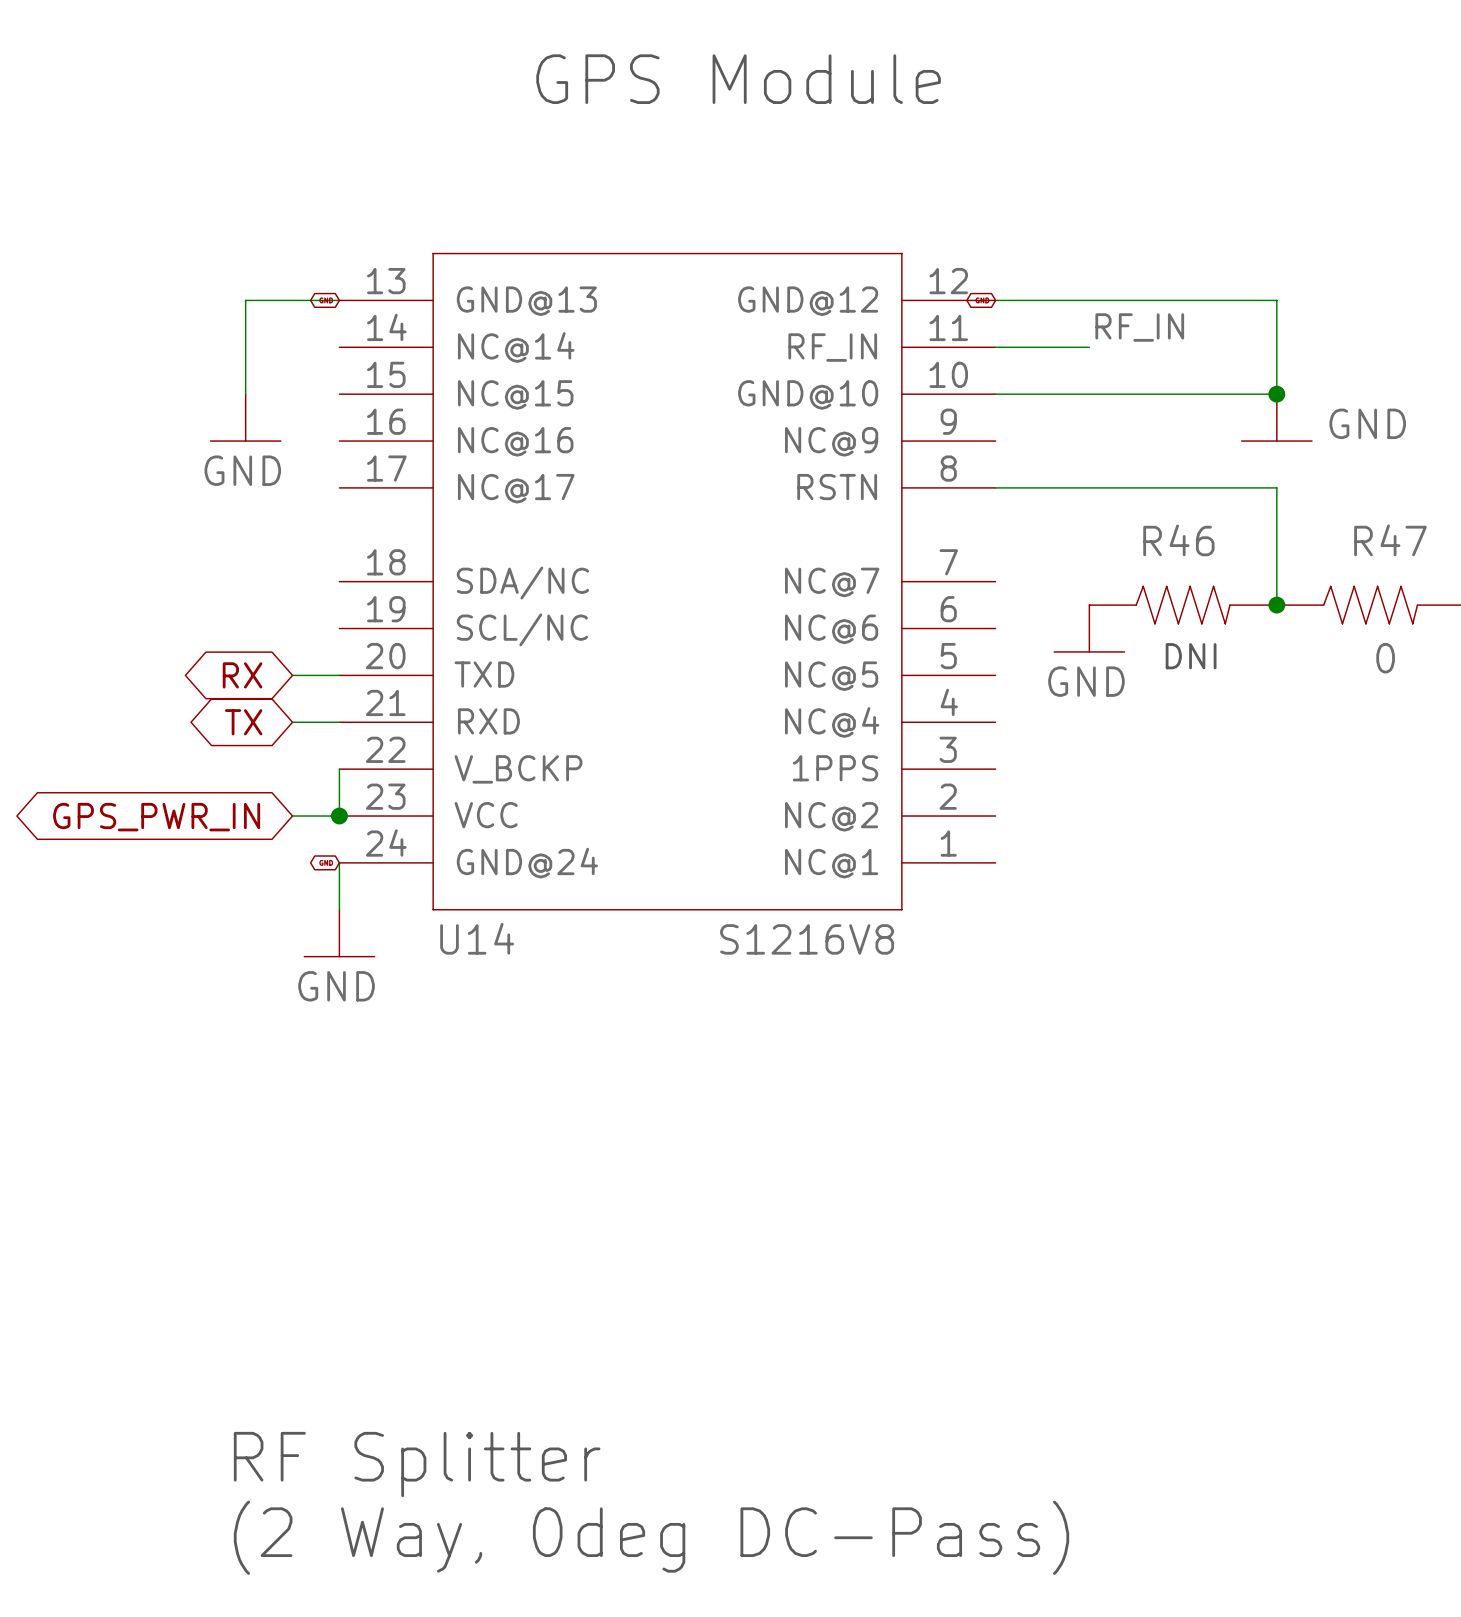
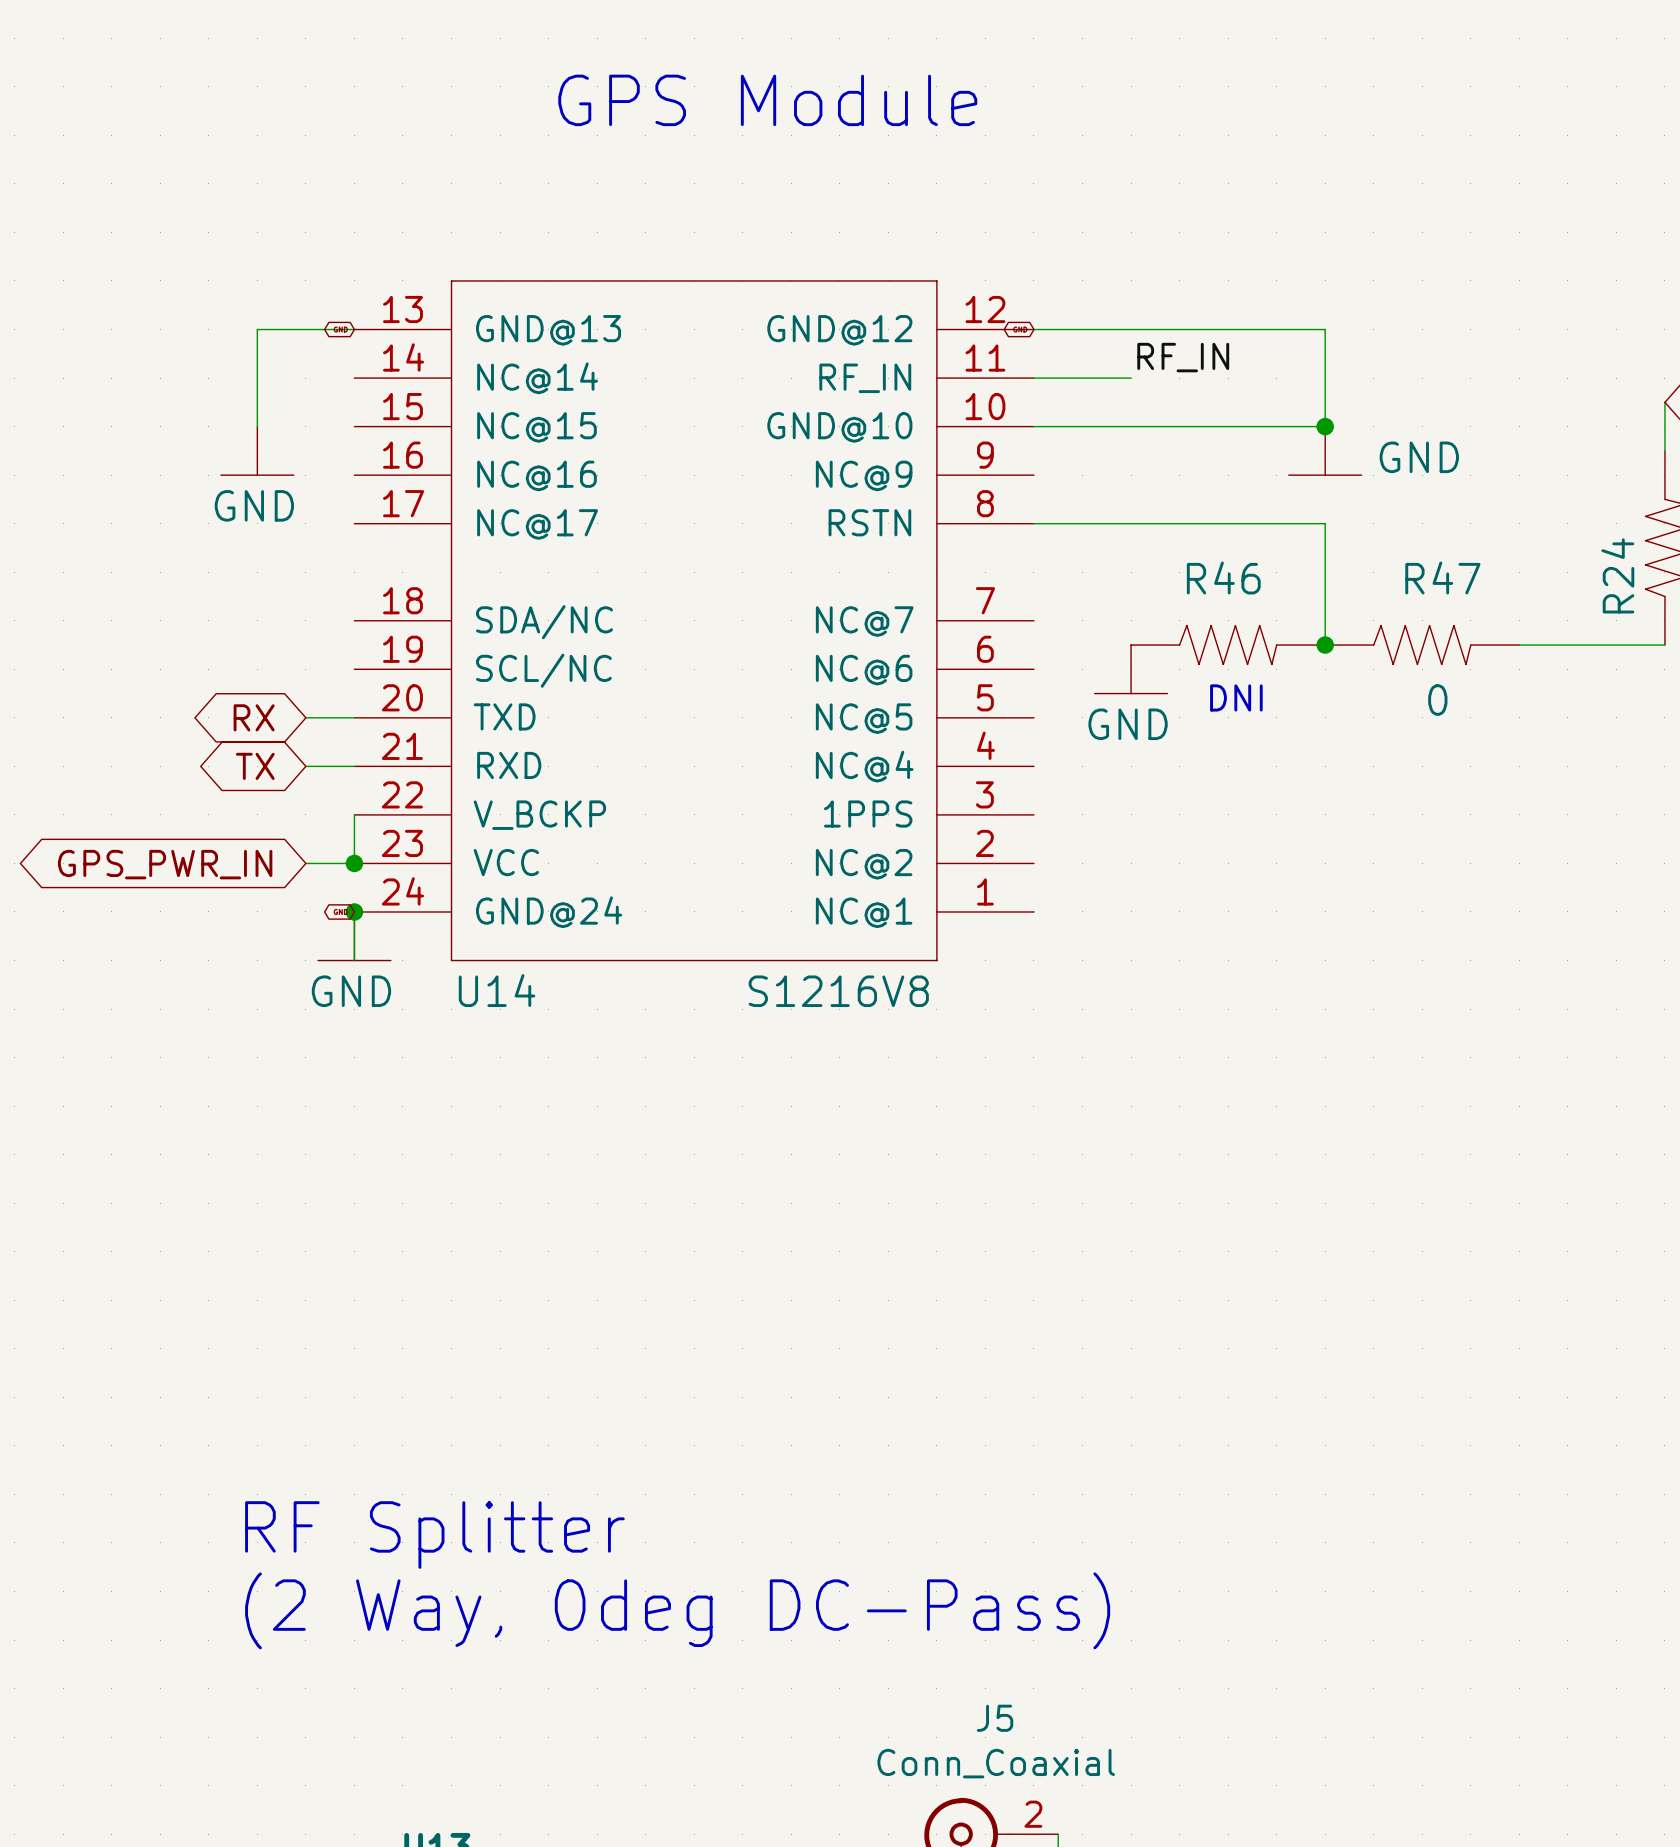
junction: none -> (354, 911)
power symbol position: GND (339, 933) -> GND (354, 936)

